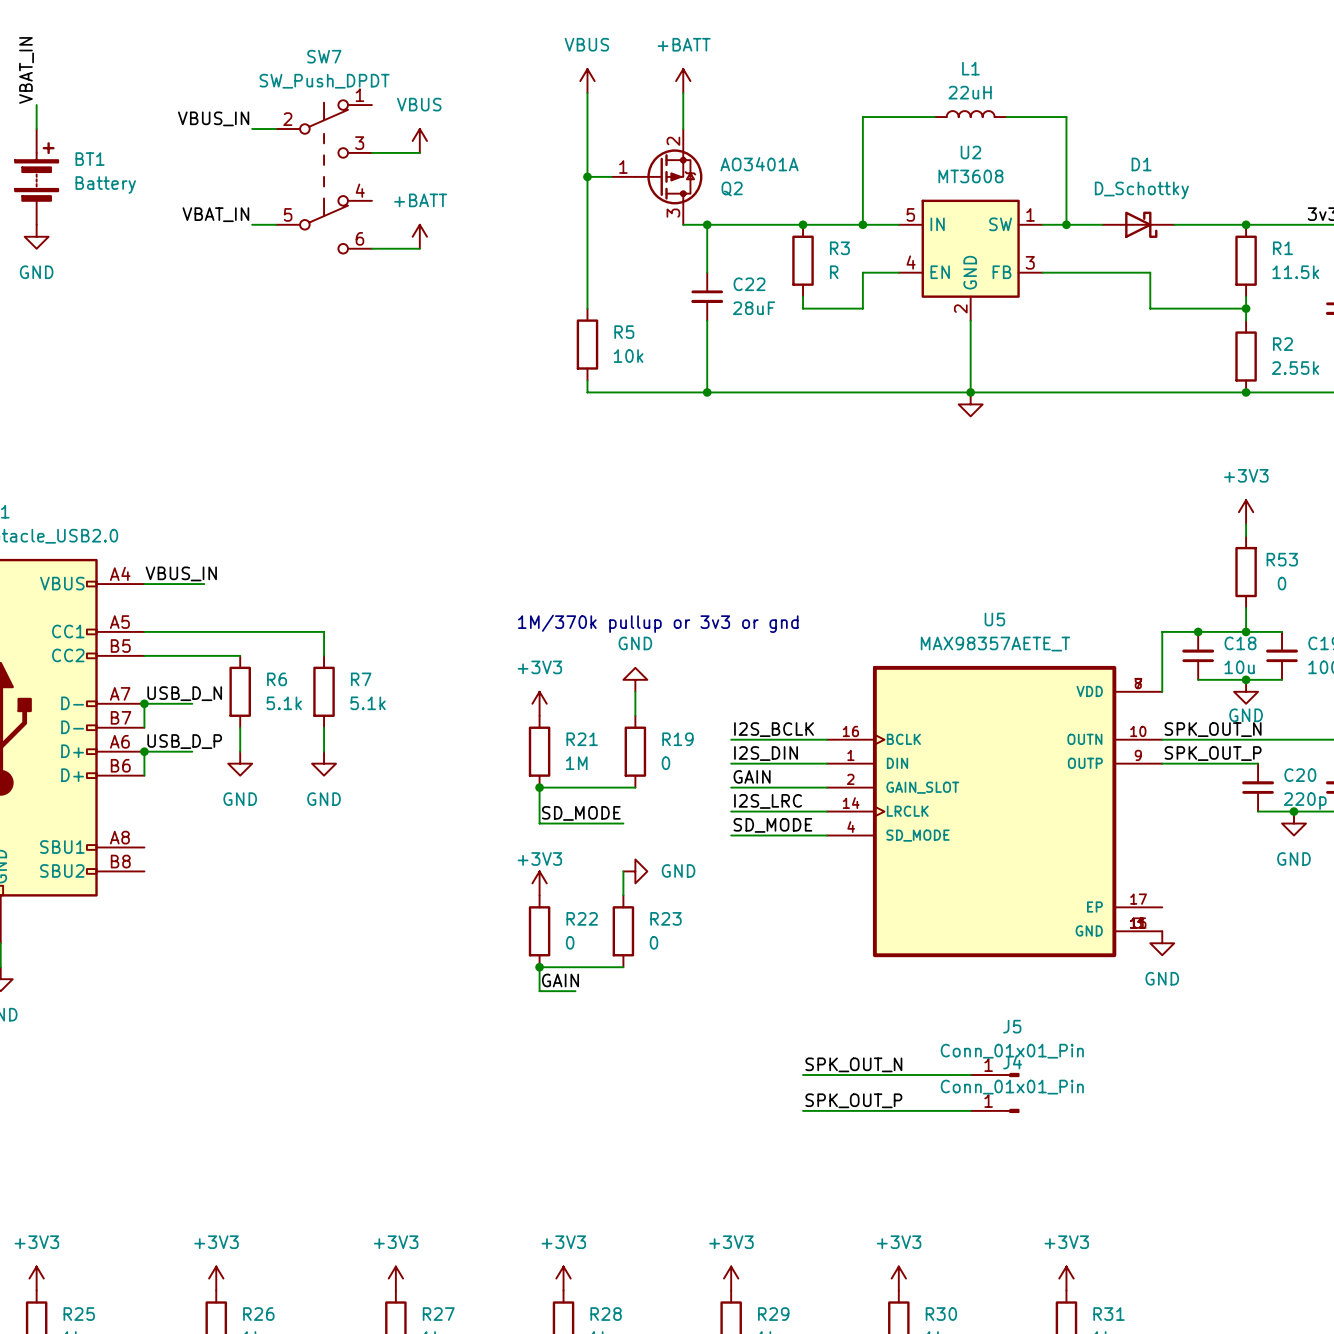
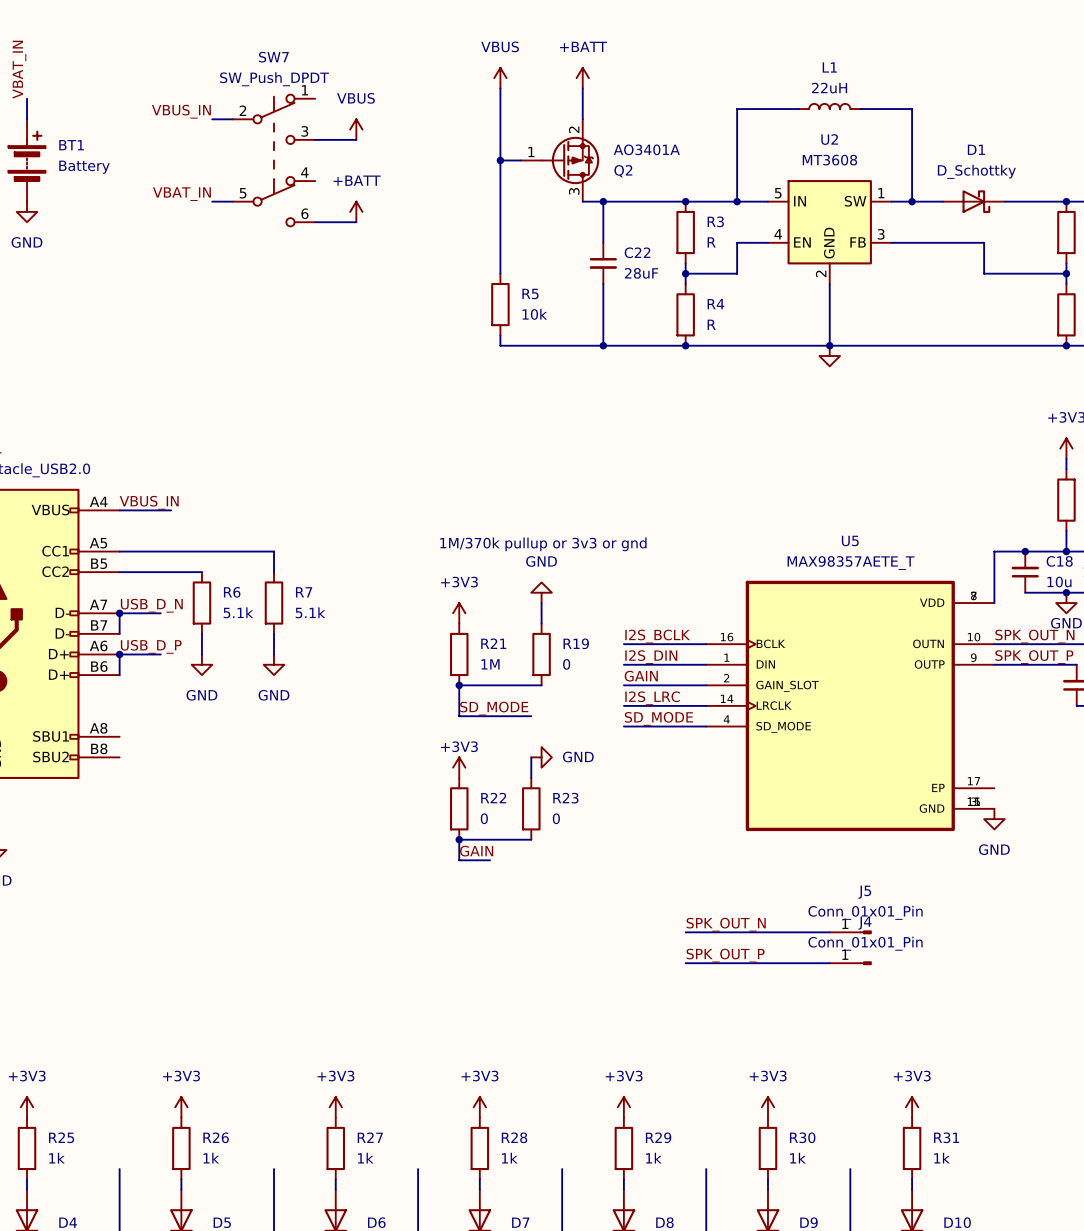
wire: none -> (685, 273) (685, 283)
junction: none -> (685, 273)
R4: none -> R (685, 314)
junction: none -> (685, 345)

